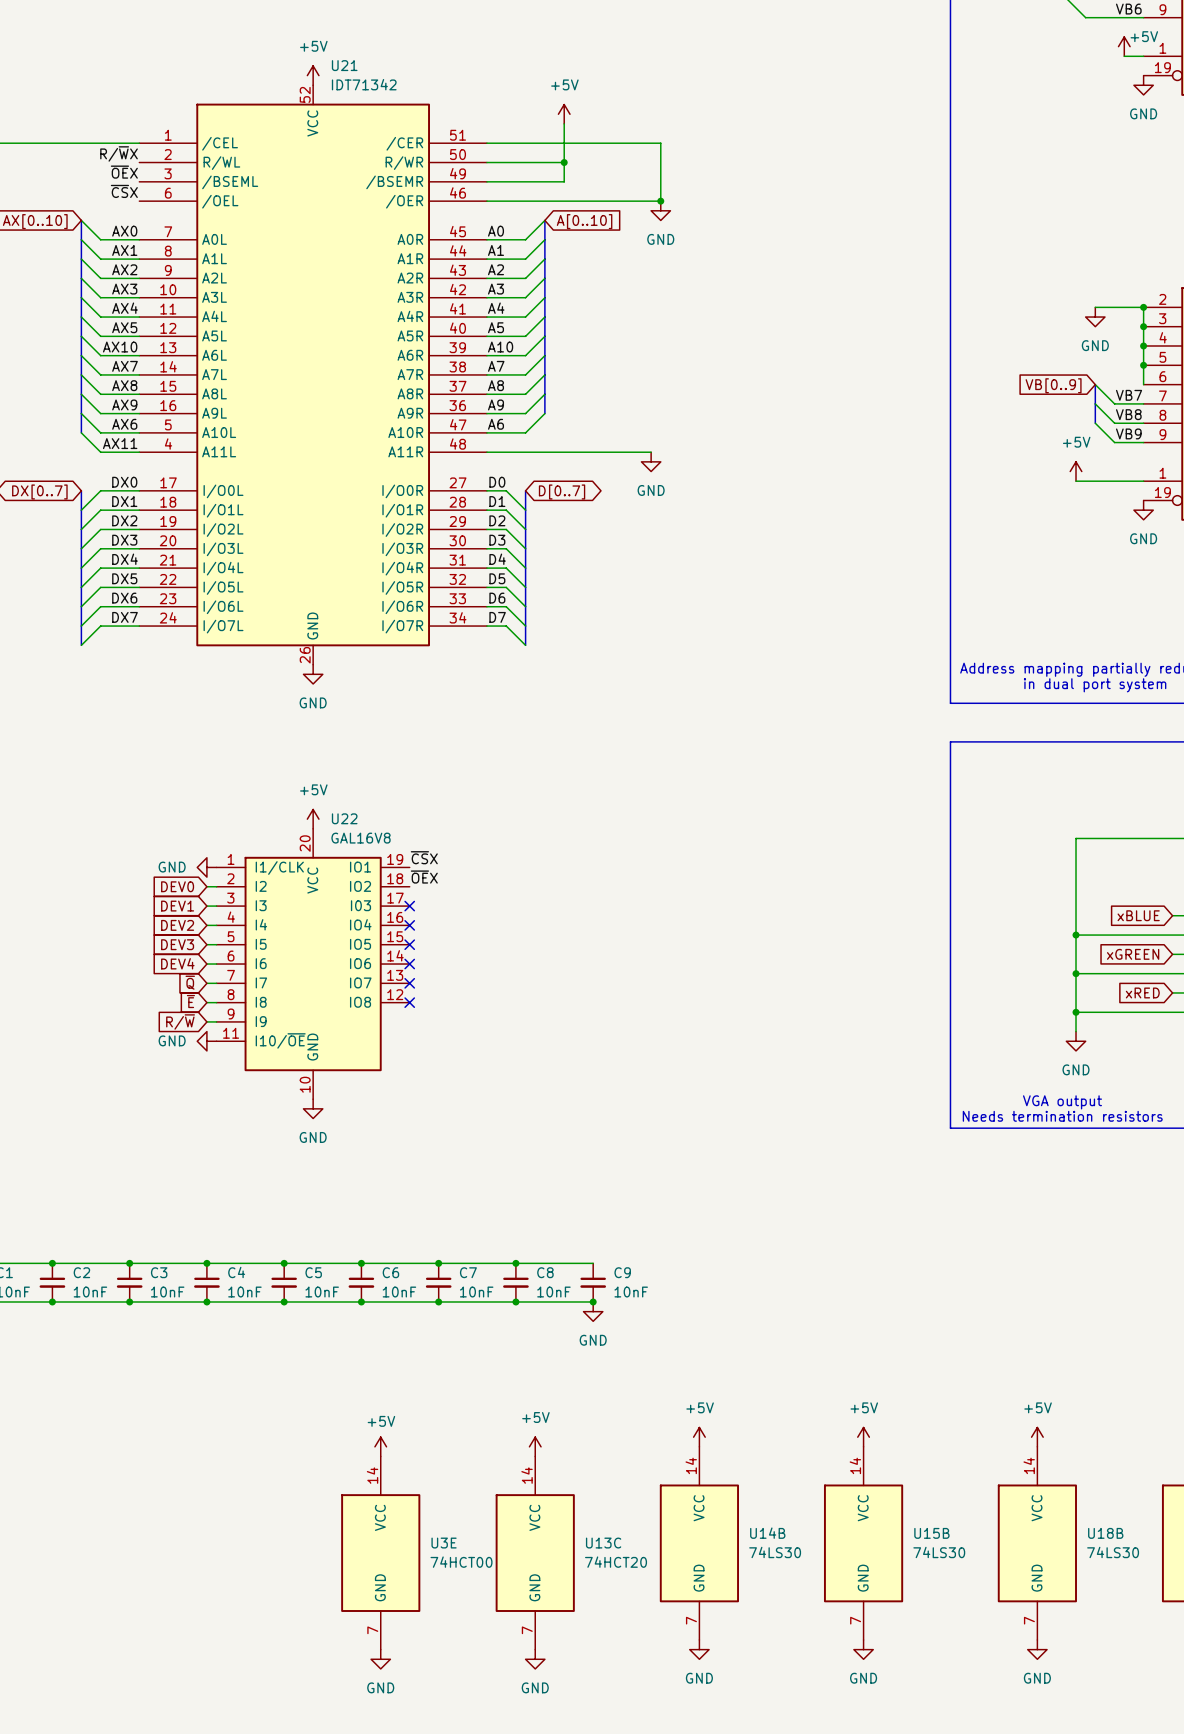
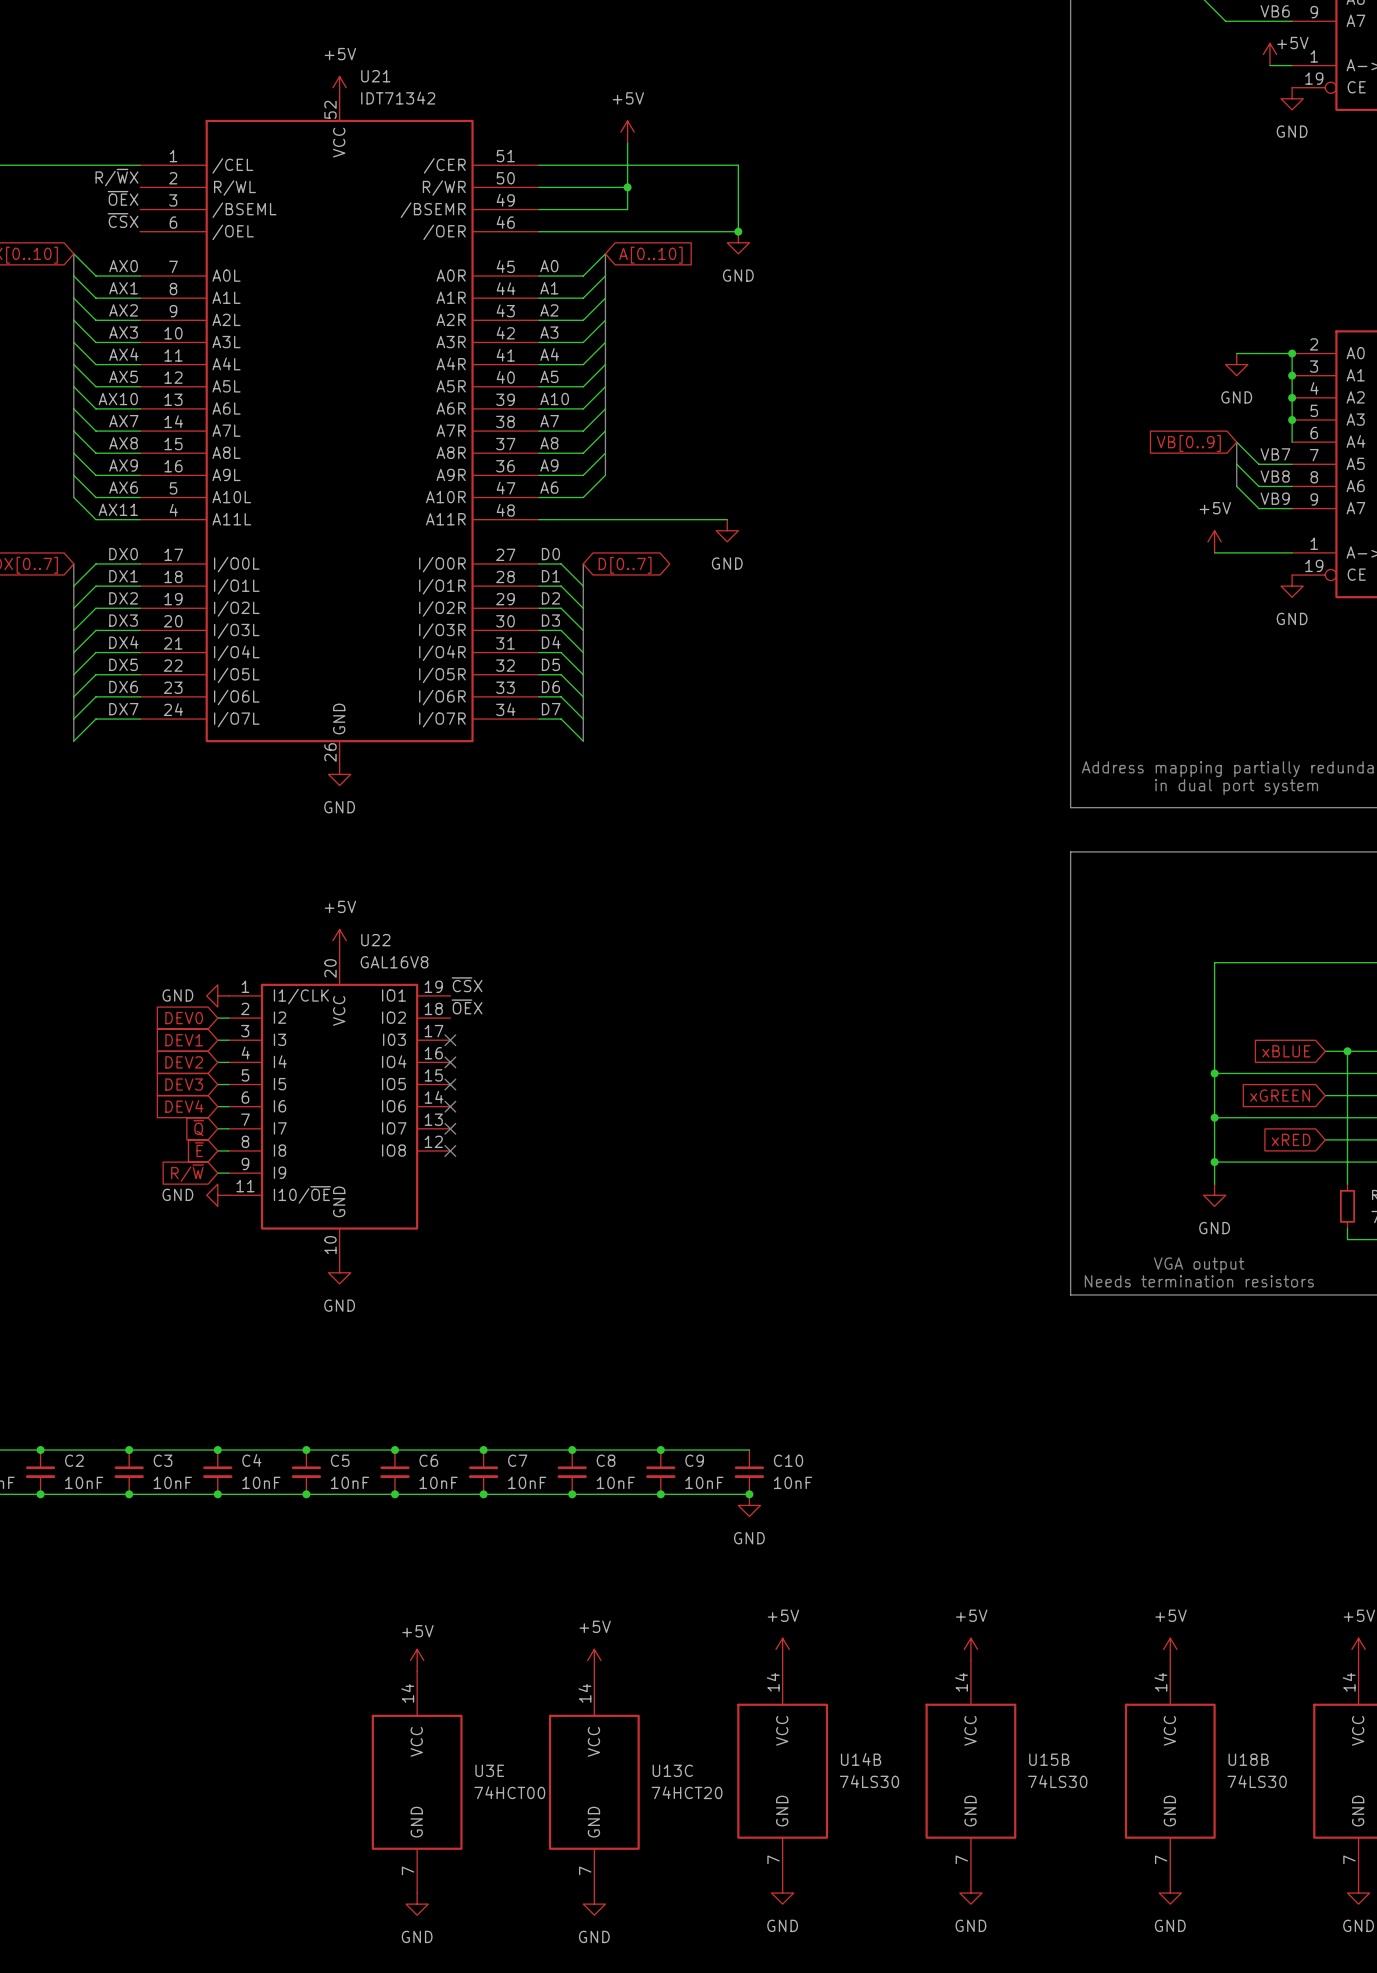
wire: none -> (660, 1450) (749, 1450)
junction: none -> (660, 1450)
C10: none -> 10nF (749, 1472)
wire: none -> (660, 1494) (749, 1494)
junction: none -> (749, 1494)
power symbol position: GND (593, 1311) -> GND (749, 1505)

